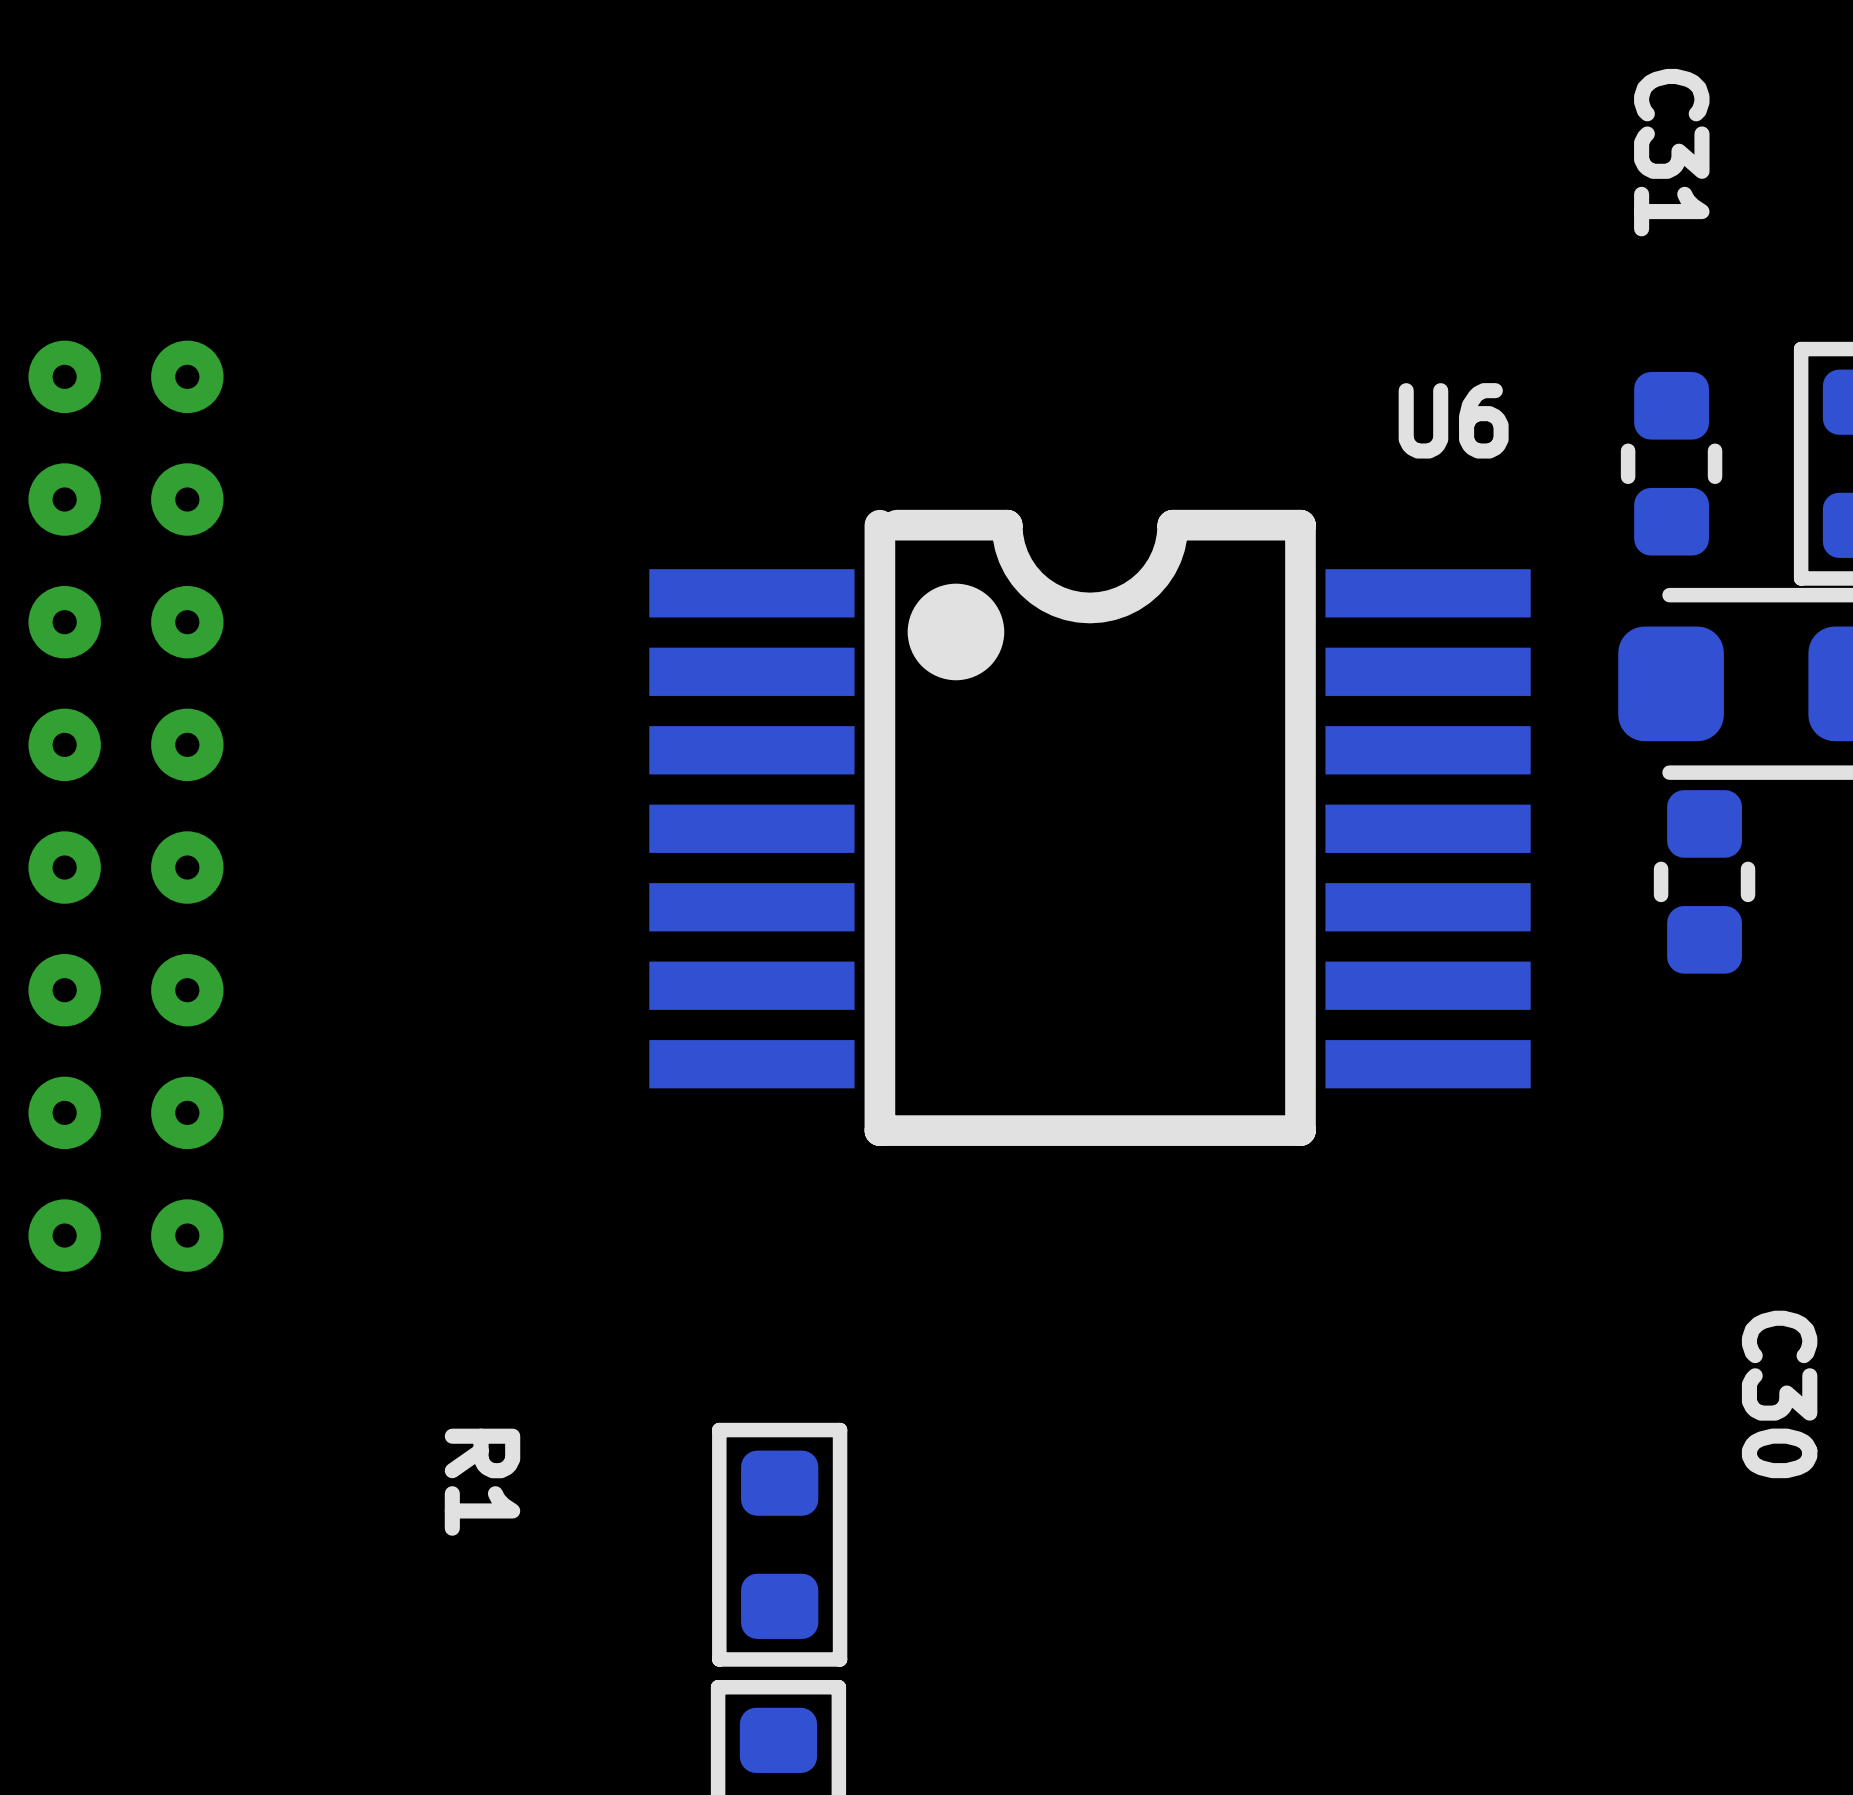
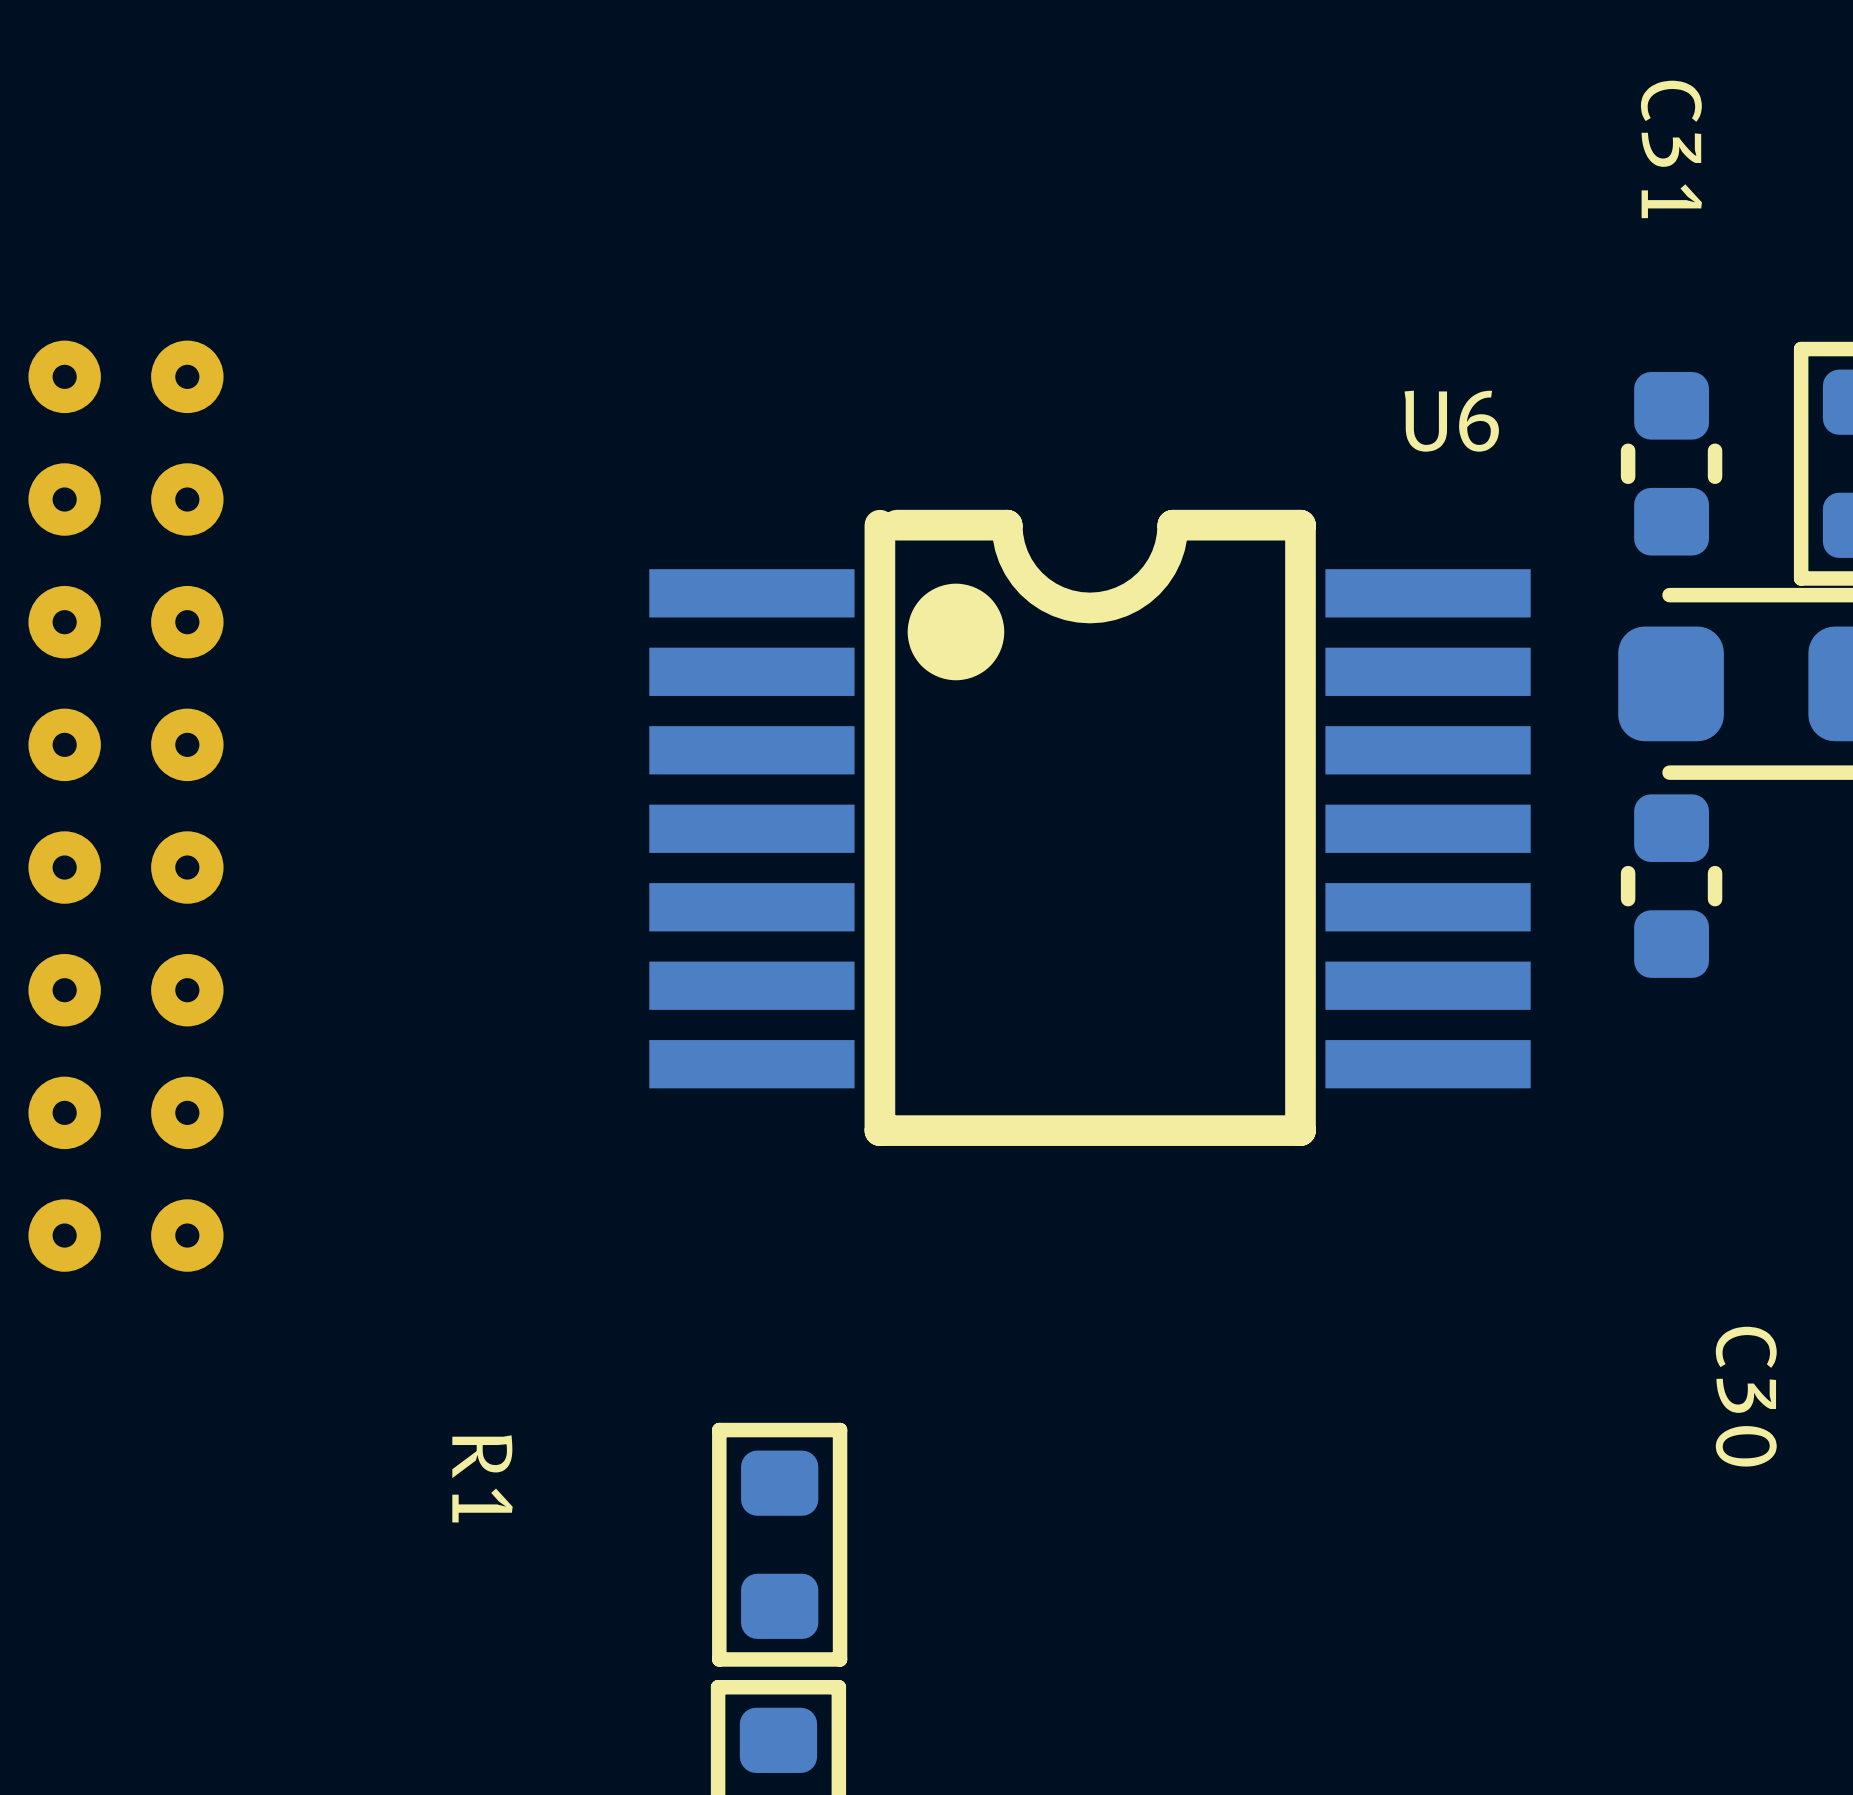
C30 position: (1704, 881) -> (1671, 886)

